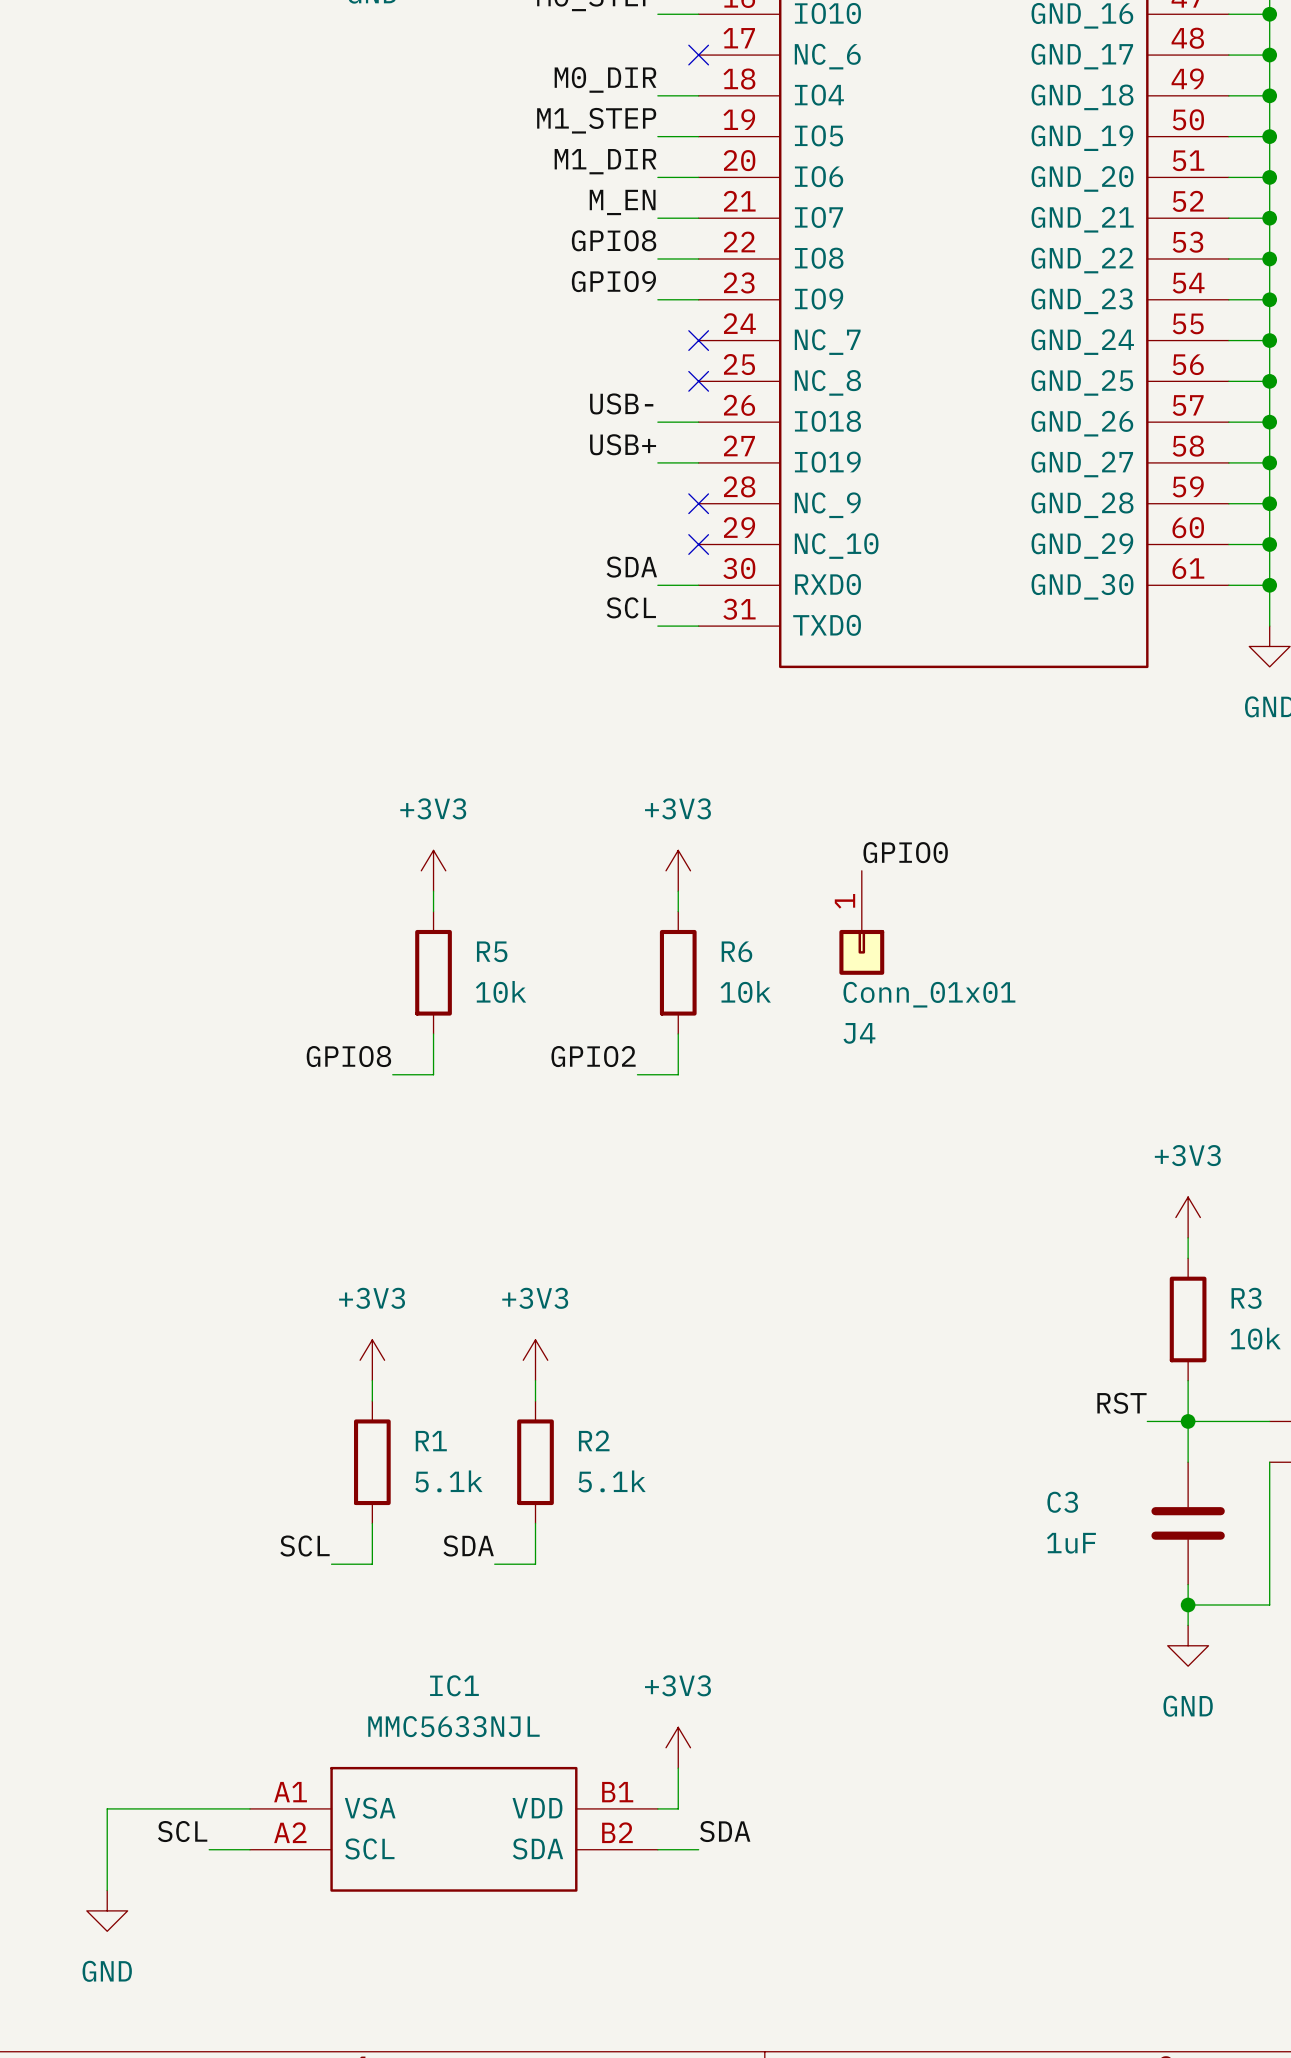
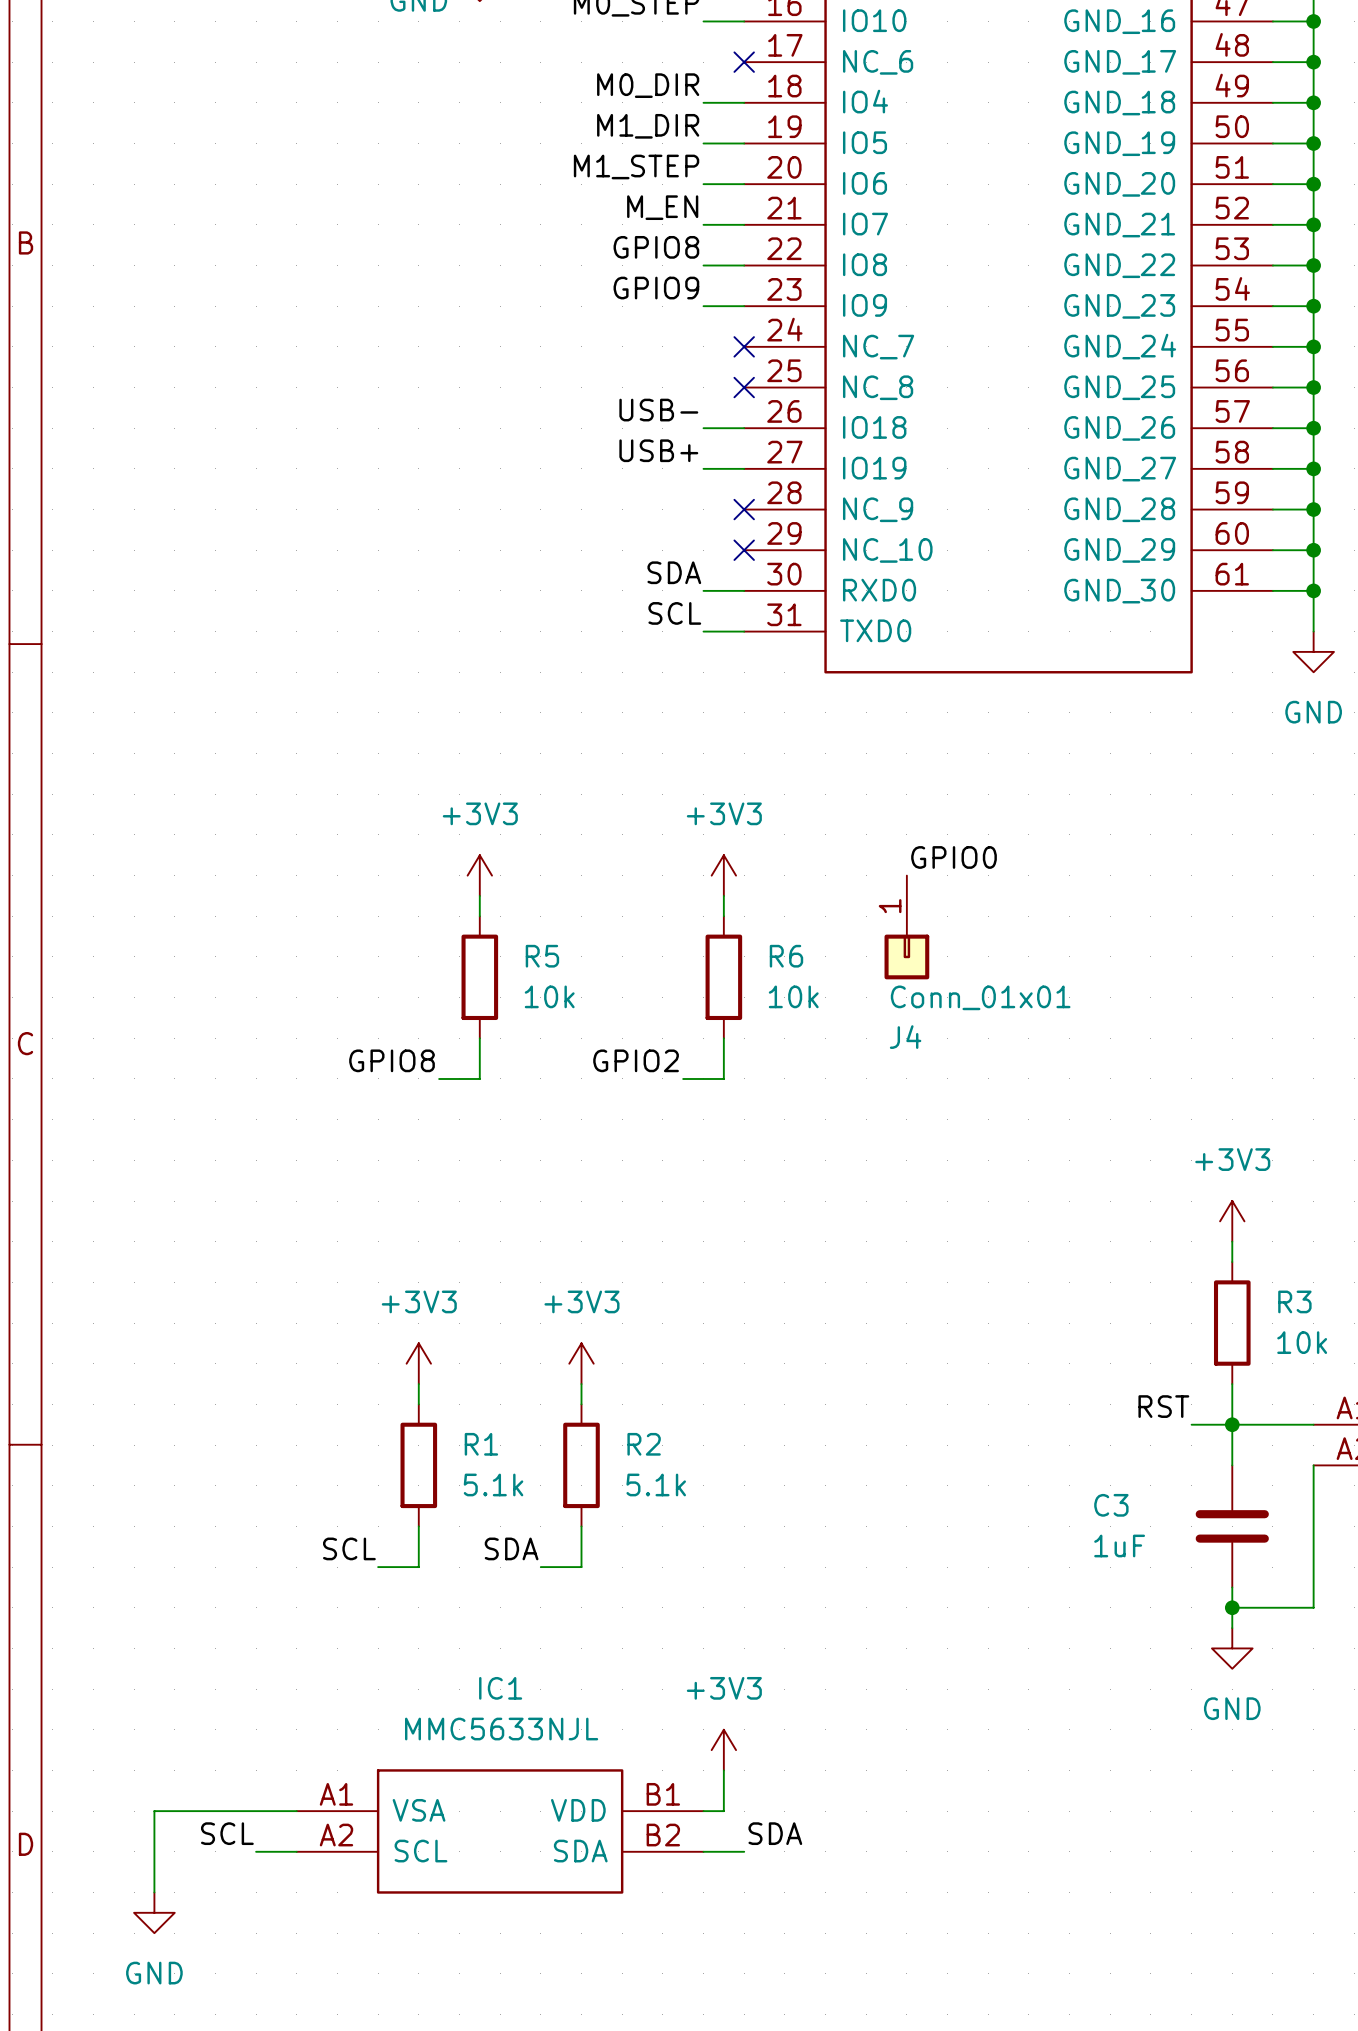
label: M1_STEP (596, 120) -> M1_DIR (648, 126)
label: M1_DIR (605, 161) -> M1_STEP (636, 166)

